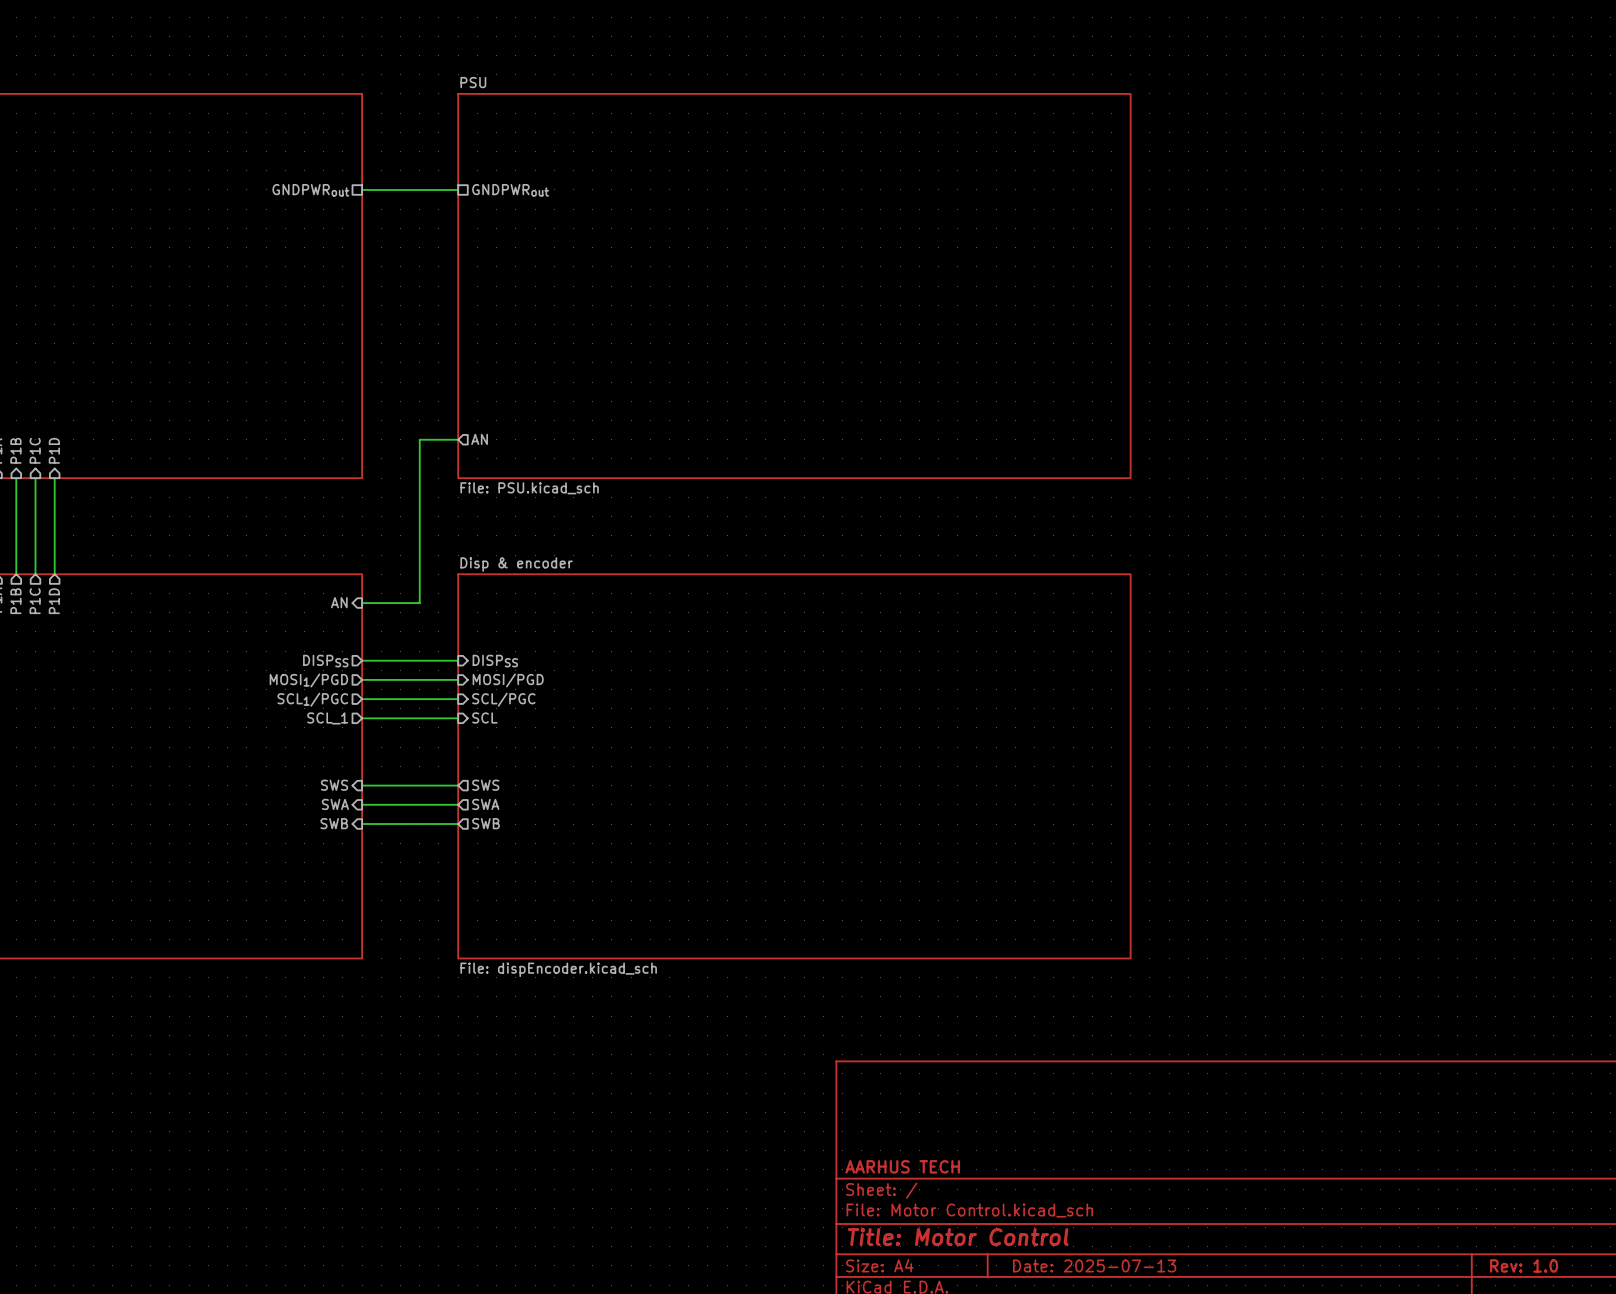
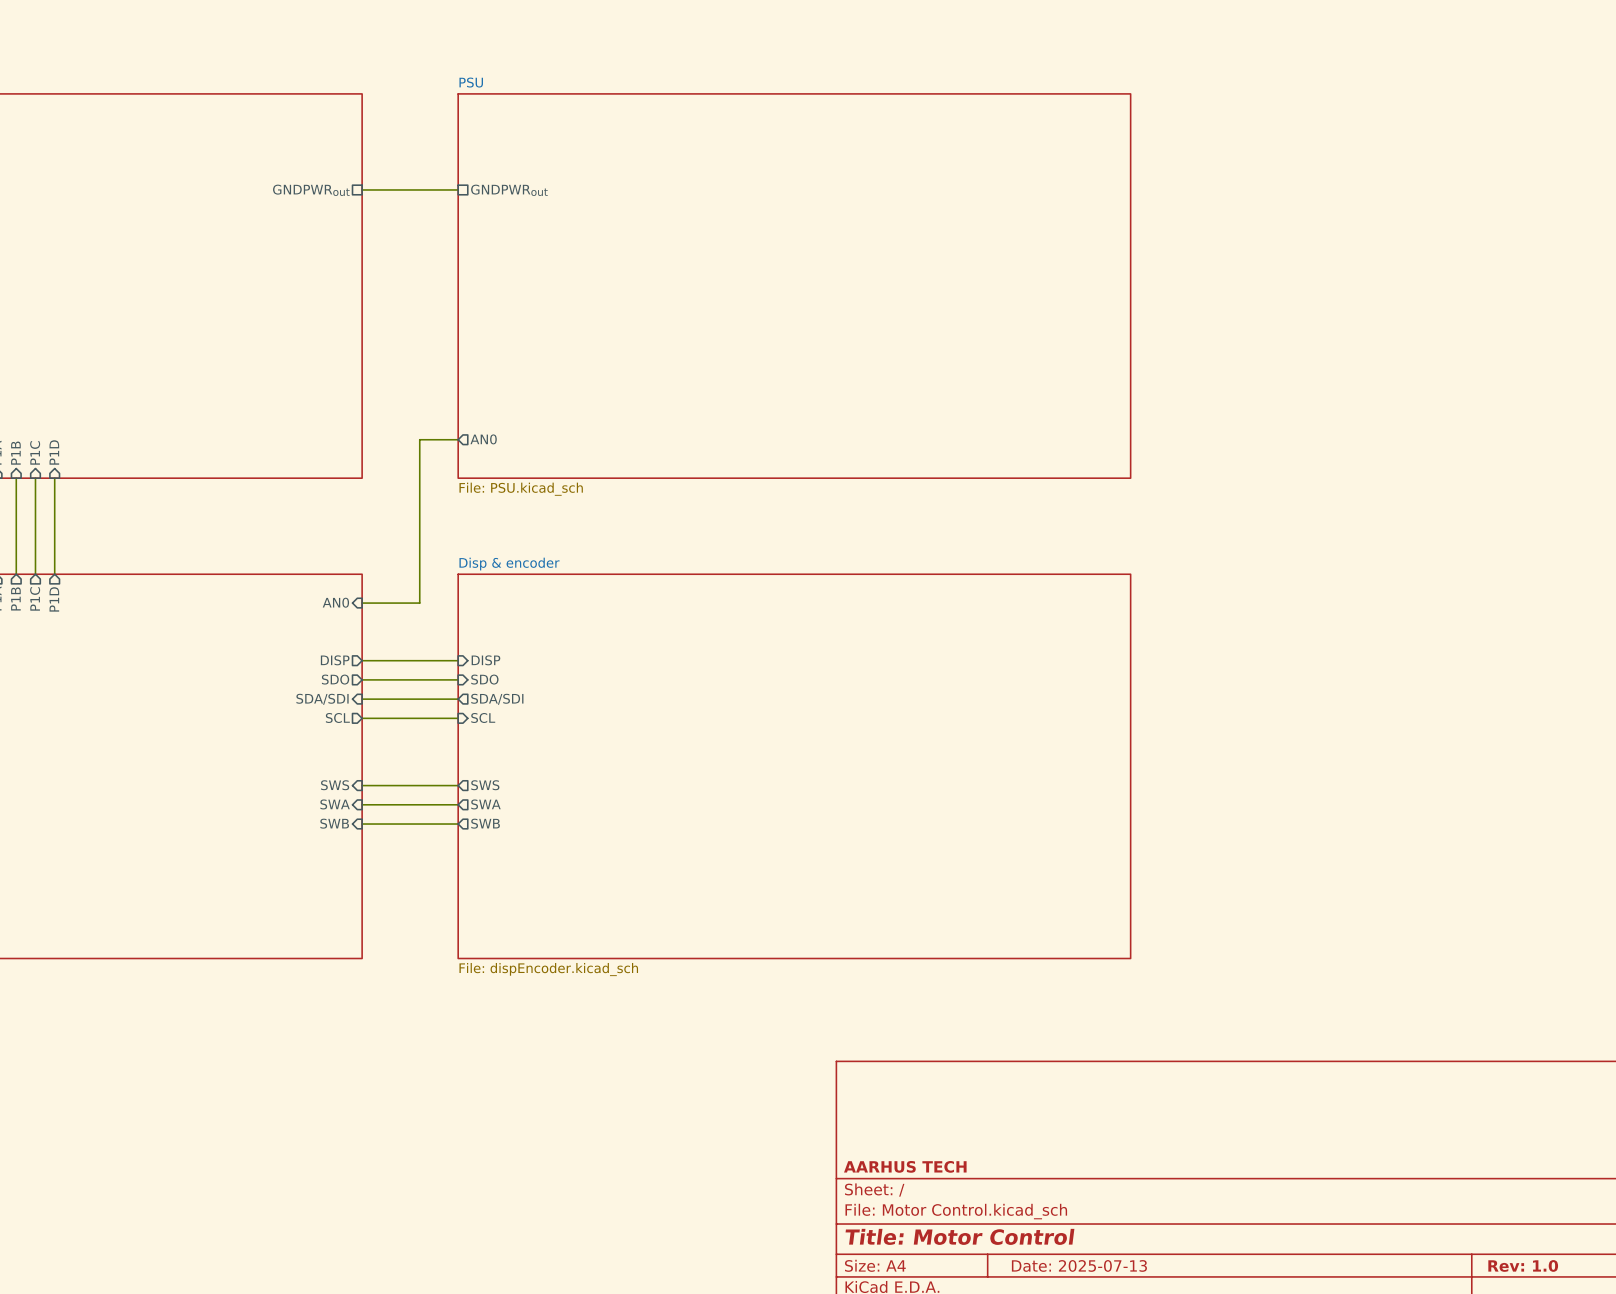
sheet pin: AN (479, 439) -> AN0 (483, 439)
sheet pin: AN (339, 602) -> AN0 (335, 602)
sheet pin: DISPSS (325, 661) -> DISP (335, 660)
sheet pin: DISPSS (495, 661) -> DISP (485, 660)
sheet pin: MOSI1/PGD (308, 680) -> SDO (335, 679)
sheet pin: MOSI/PGD (508, 680) -> SDO (484, 679)
sheet pin shape: output (312, 699) -> input (322, 699)
sheet pin: SCL1/PGC (312, 699) -> SDA/SDI (322, 699)
sheet pin shape: input (503, 699) -> output (497, 699)
sheet pin: SCL/PGC (503, 699) -> SDA/SDI (497, 699)
sheet pin: SCL_1 (327, 718) -> SCL (337, 717)

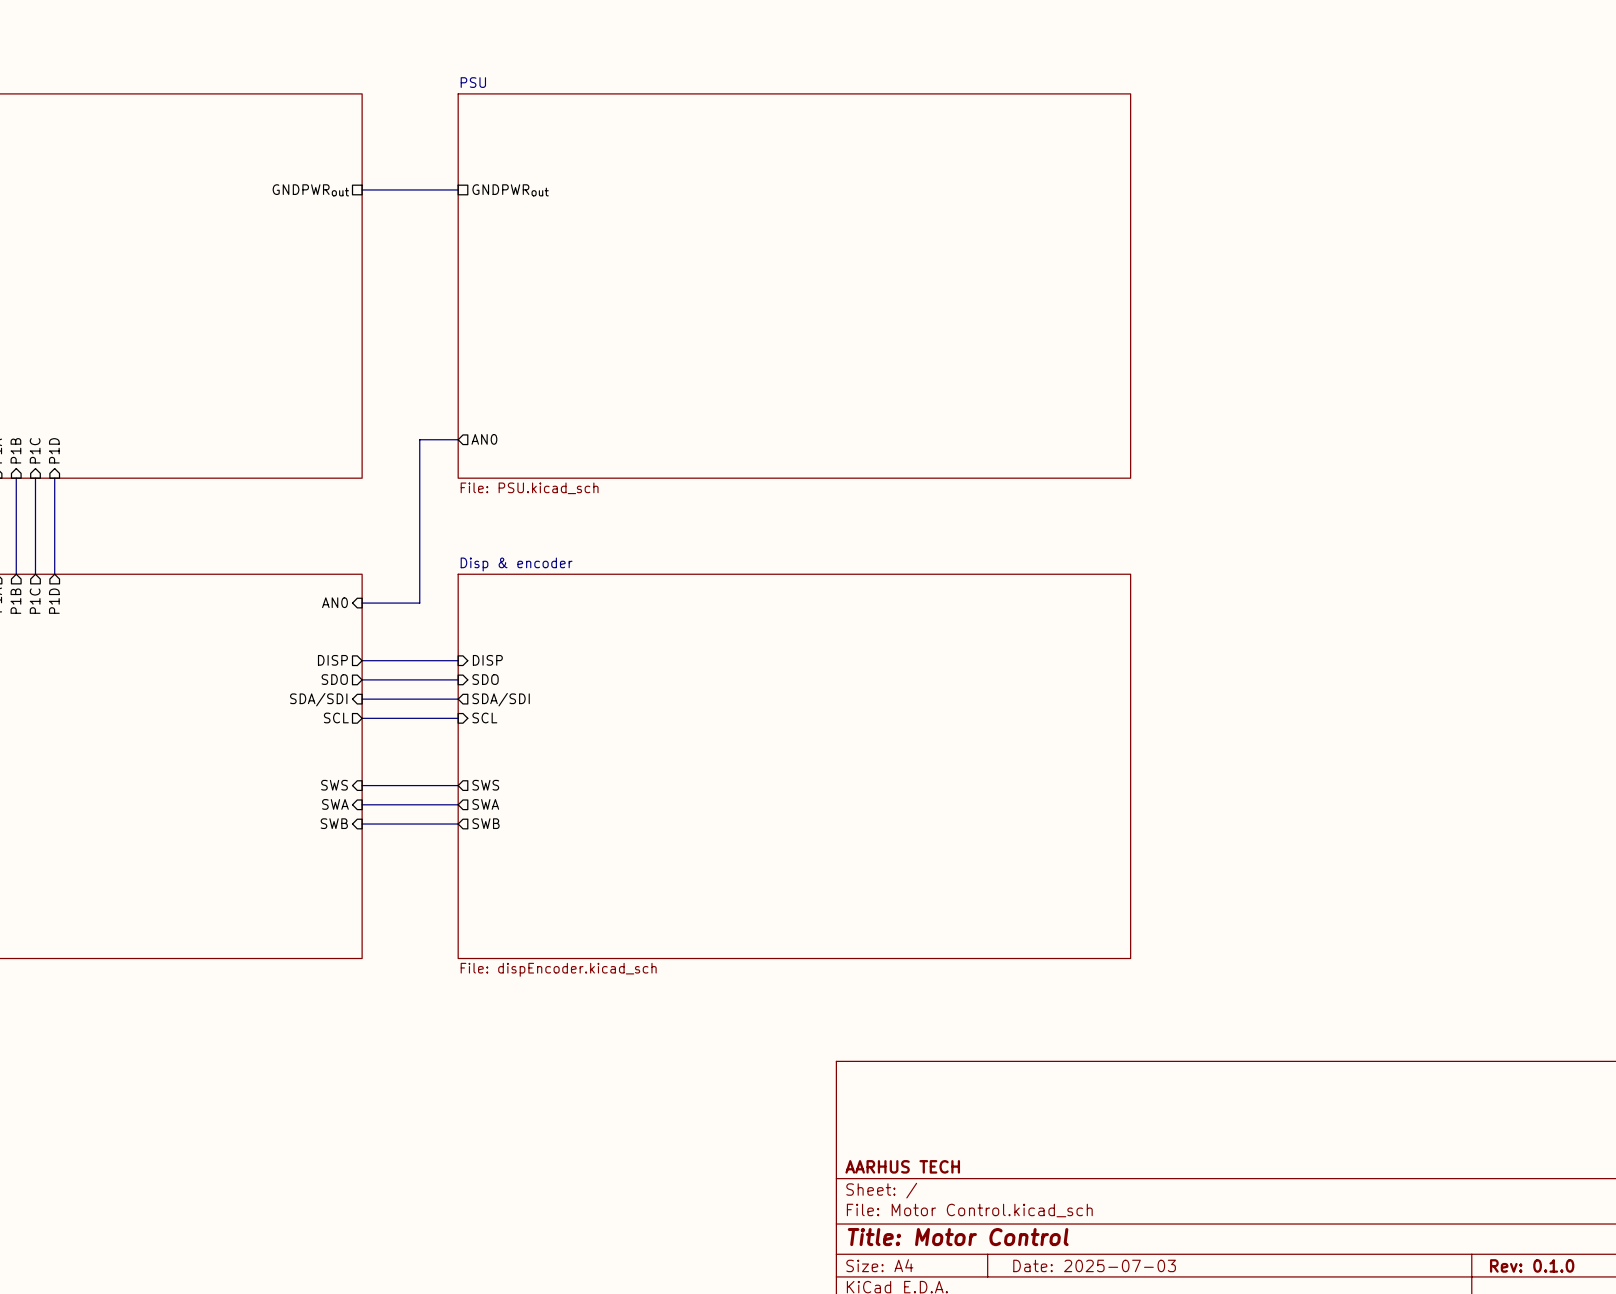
title block: Date: 2025-07-13 (1079, 1265) -> Date: 2025-07-03 (1094, 1265)
title block: Rev: 1.0 (1523, 1265) -> Rev: 0.1.0 (1532, 1265)

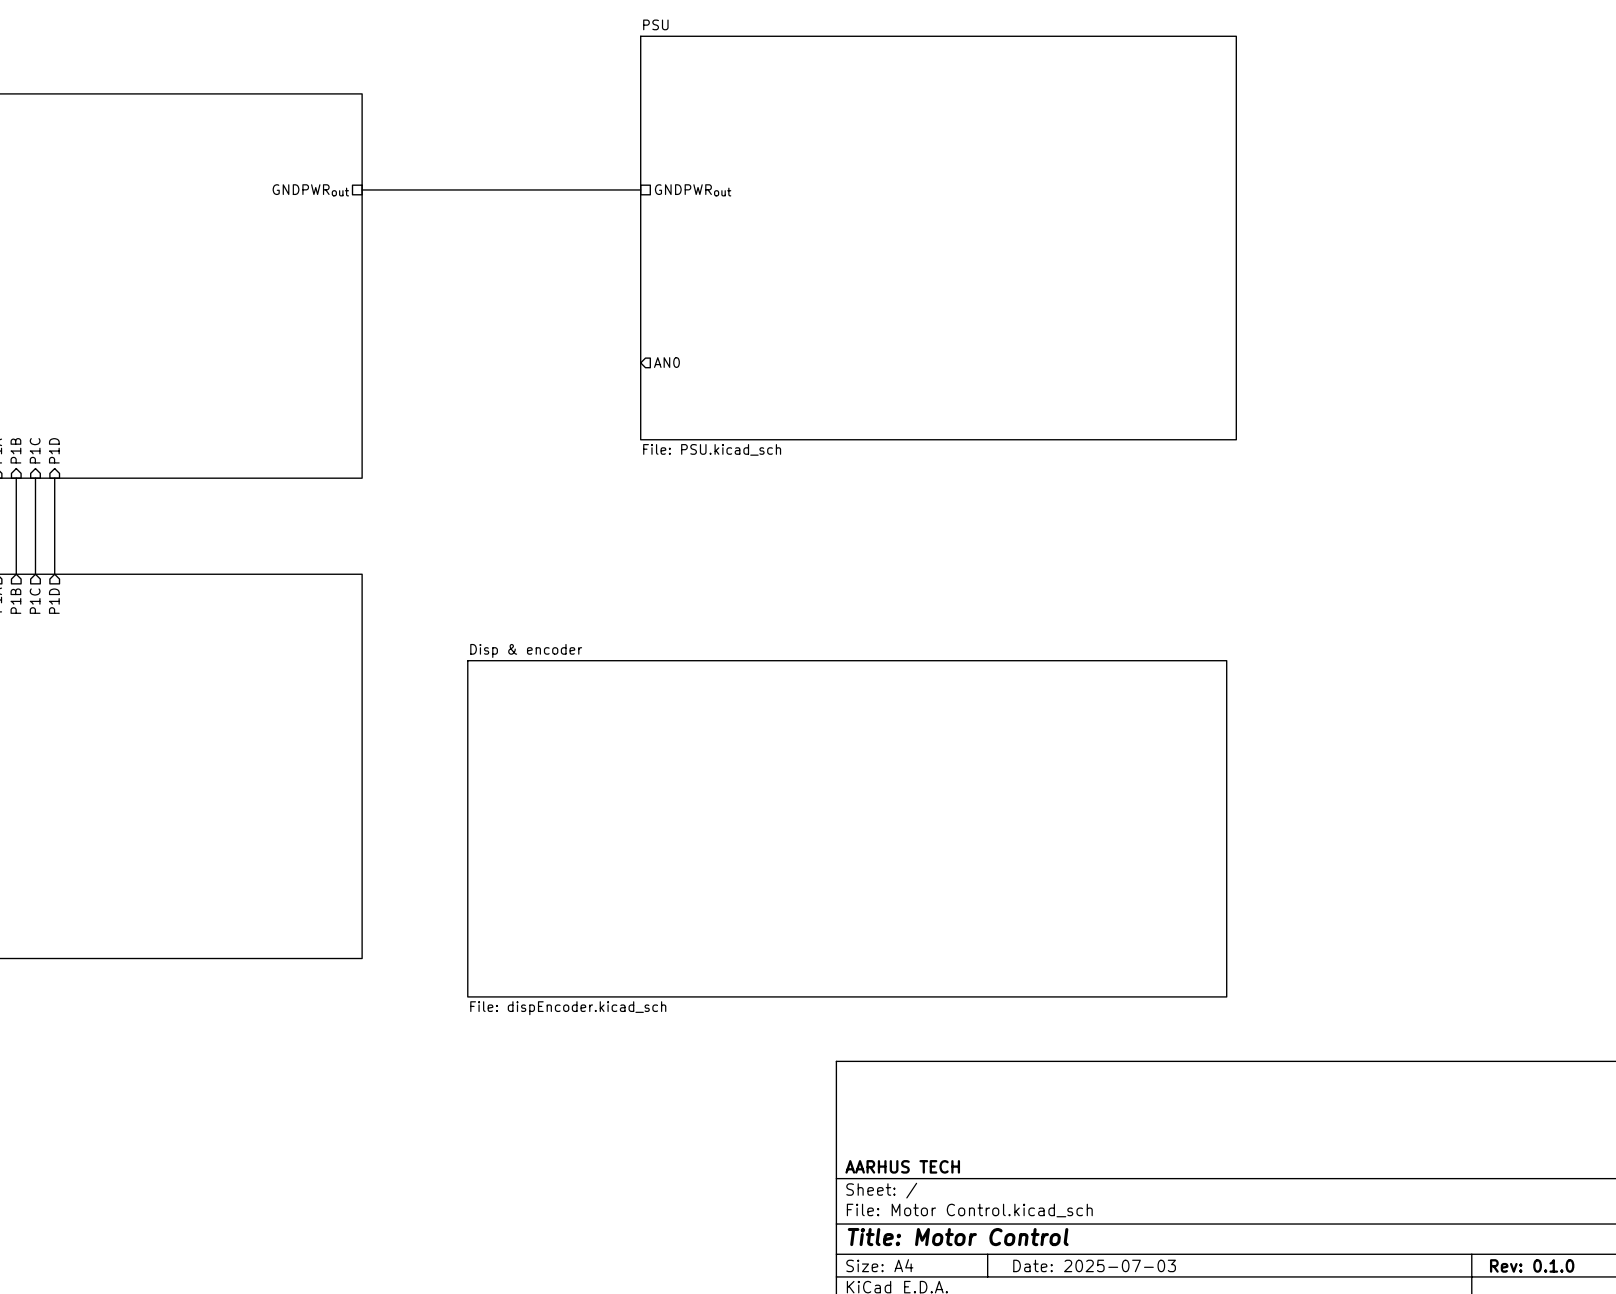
wire: none -> (458, 189) (640, 189)
sheet pin position: GNDPWRout (510, 190) -> GNDPWRout (693, 190)
sheet PSU: none -> File: PSU.kicad_sch (938, 238)
sheet PSU: File: PSU.kicad_sch (794, 286) -> none
sheet pin: none -> AN0 (666, 362)
wire: (458, 439) (419, 439) (419, 603) (362, 603) -> none
sheet pin: AN0 (484, 439) -> none
sheet pin: AN0 (334, 602) -> none
sheet pin: DISP (332, 660) -> none
wire: (362, 660) (458, 660) -> none
sheet pin: DISP (487, 660) -> none
sheet pin: SDO (334, 679) -> none
wire: (362, 679) (458, 679) -> none
sheet pin: SDO (485, 679) -> none
sheet pin: SDA/SDI (318, 699) -> none
wire: (362, 699) (458, 699) -> none
sheet pin: SDA/SDI (501, 699) -> none
sheet pin: SCL (336, 717) -> none
sheet pin: SCL (484, 717) -> none
wire: (362, 718) (458, 718) -> none
sheet Disp & encoder: File: dispEncoder.kicad_sch (794, 766) -> none
sheet pin: SWS (334, 785) -> none
wire: (362, 785) (458, 785) -> none
sheet pin: SWS (485, 785) -> none
sheet pin: SWA (335, 804) -> none
wire: (362, 804) (458, 804) -> none
sheet pin: SWA (485, 804) -> none
sheet pin: SWB (334, 823) -> none
sheet pin: SWB (486, 823) -> none
wire: (362, 824) (458, 824) -> none
sheet Disp & encoder: none -> File: dispEncoder.kicad_sch (847, 828)

